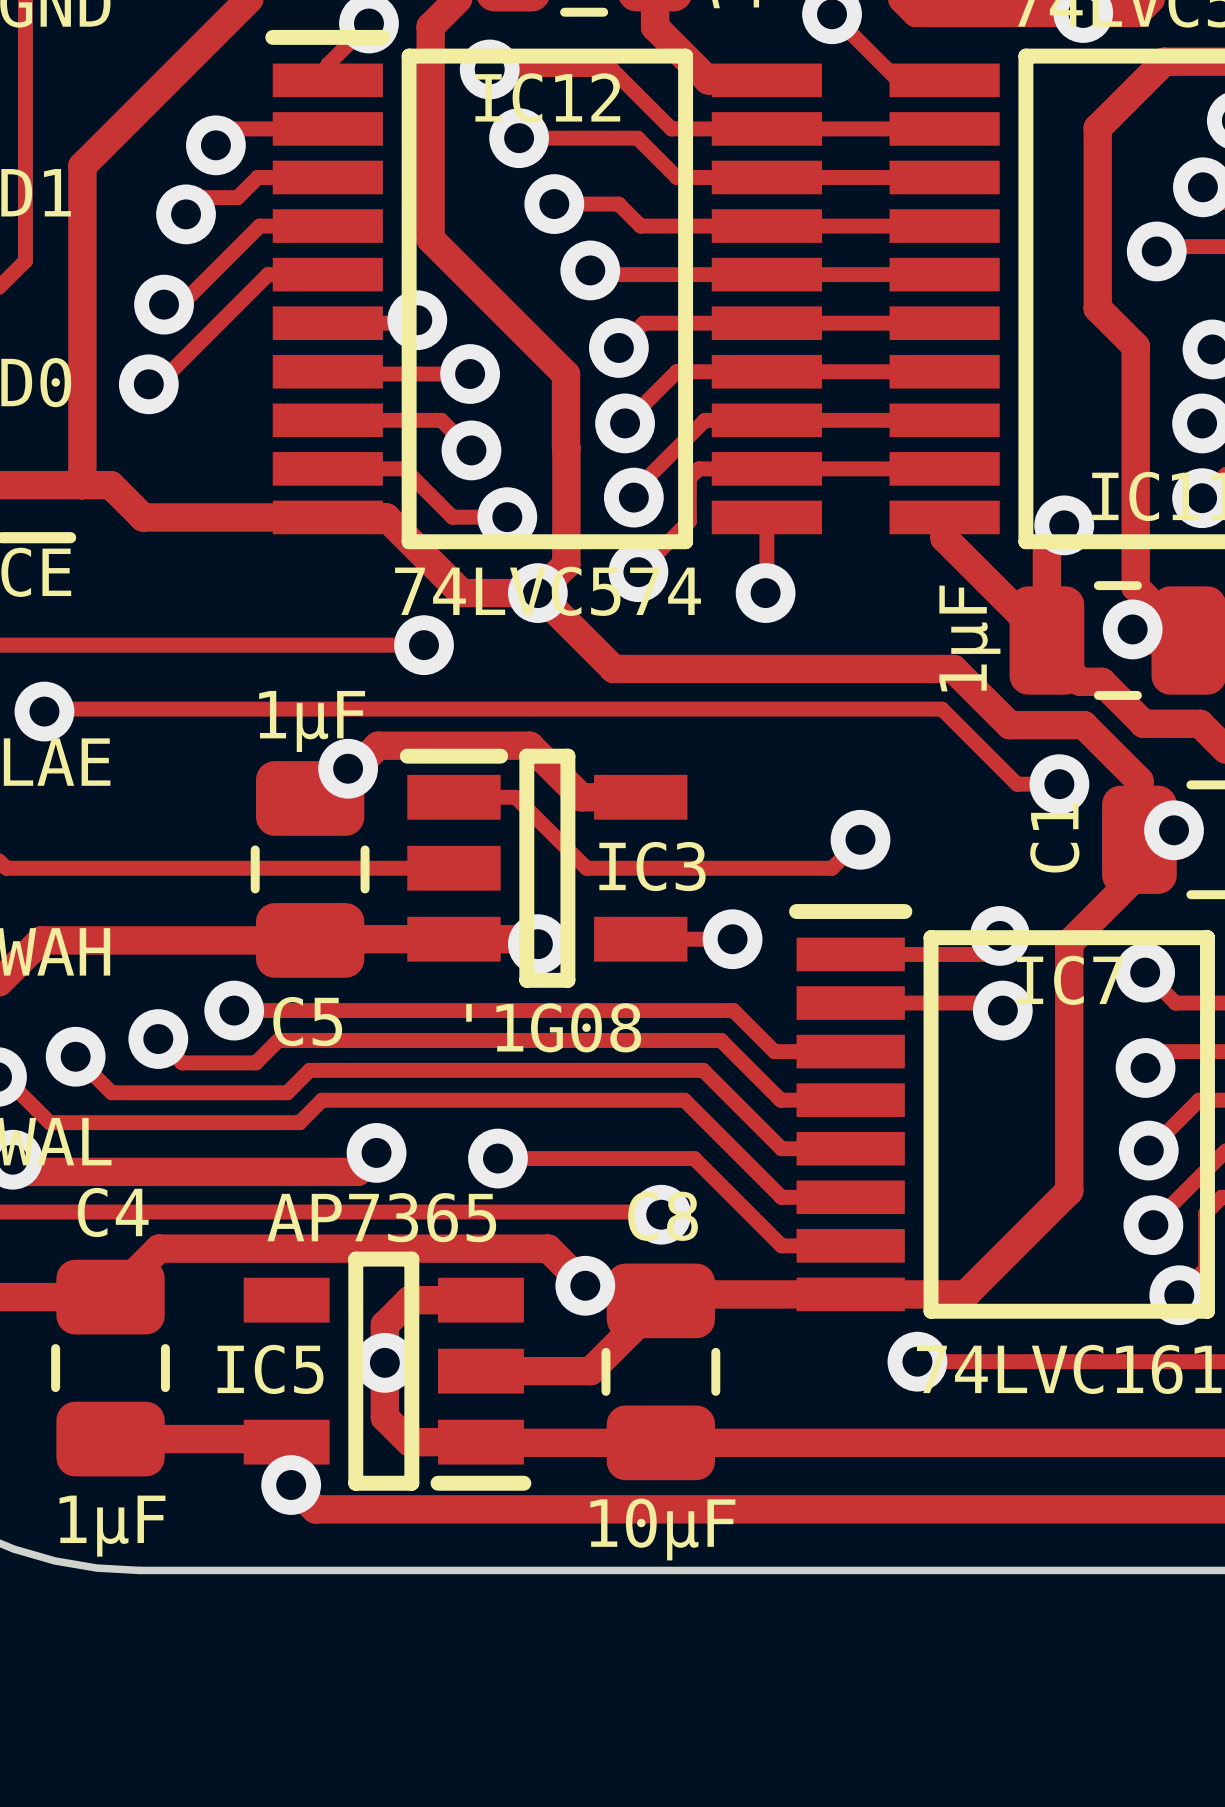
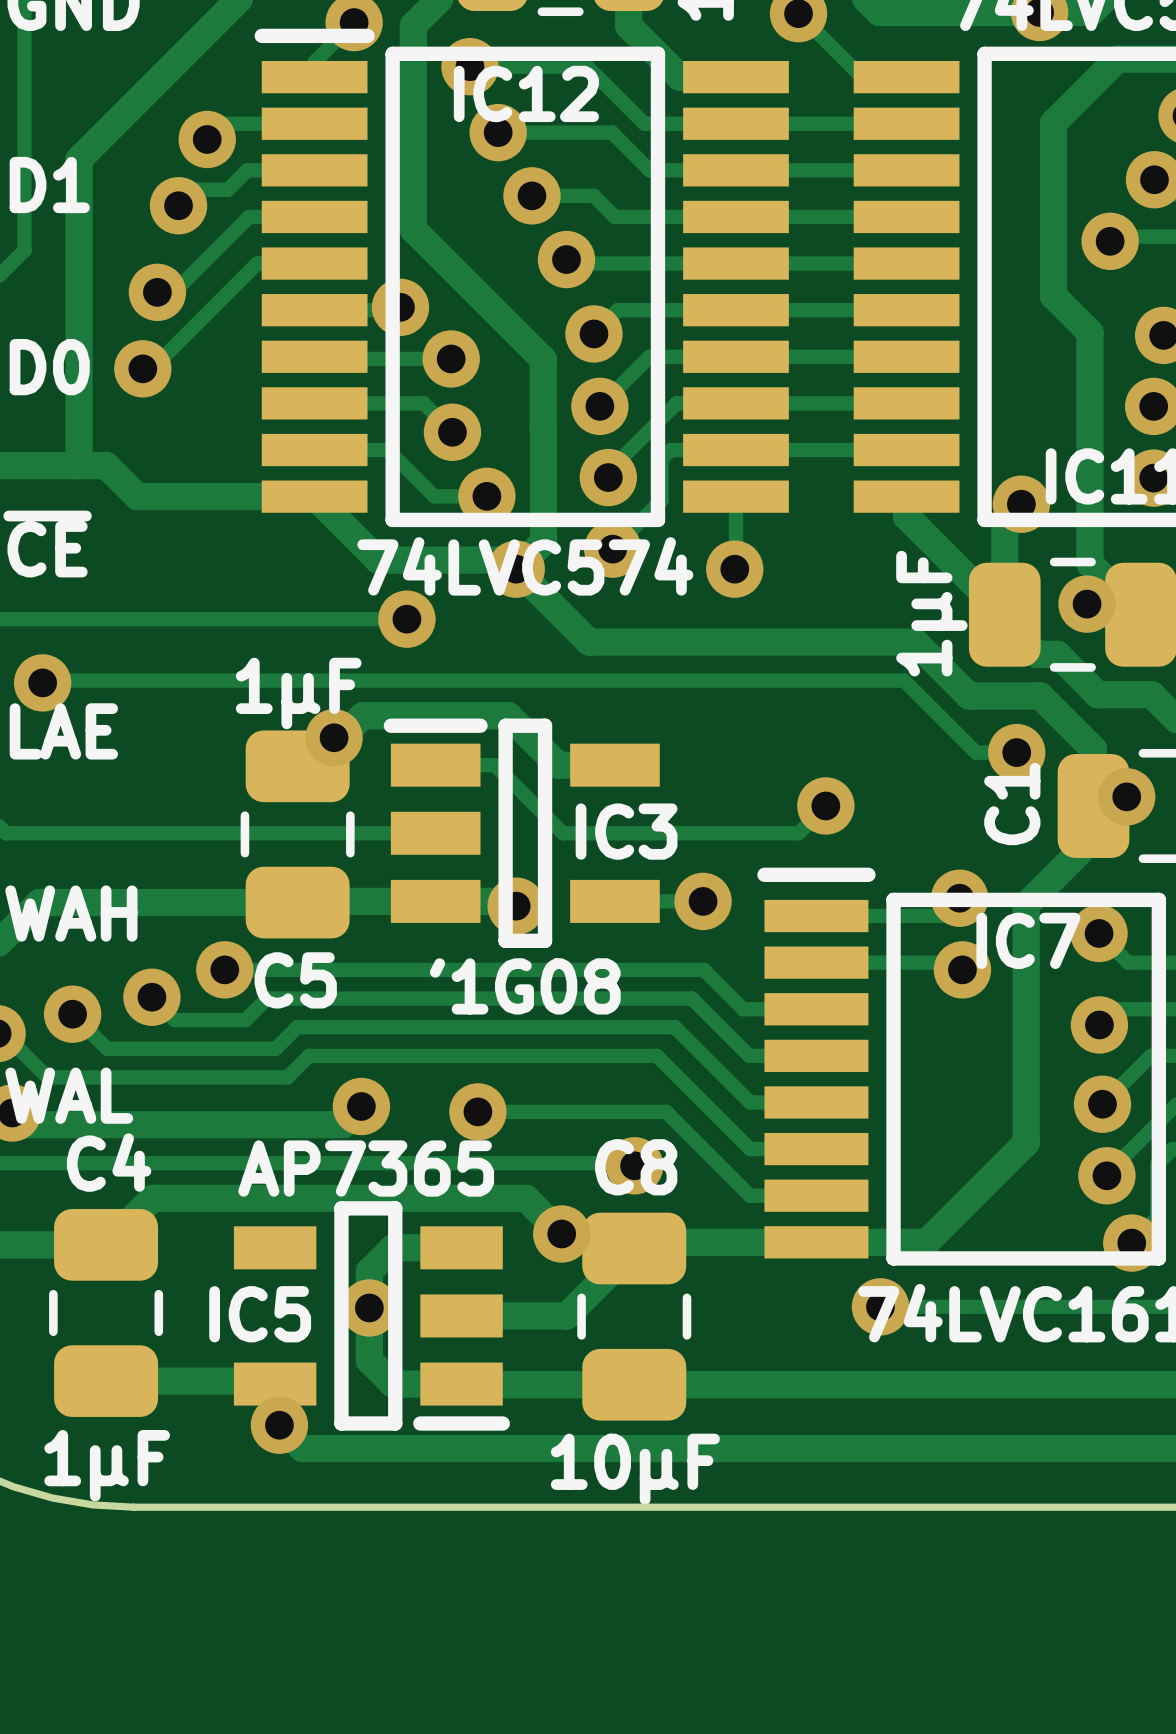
track: (327, 517) (386, 517) (461, 593) (537, 593) -> (314, 496) (378, 560) (507, 560) (516, 569)

